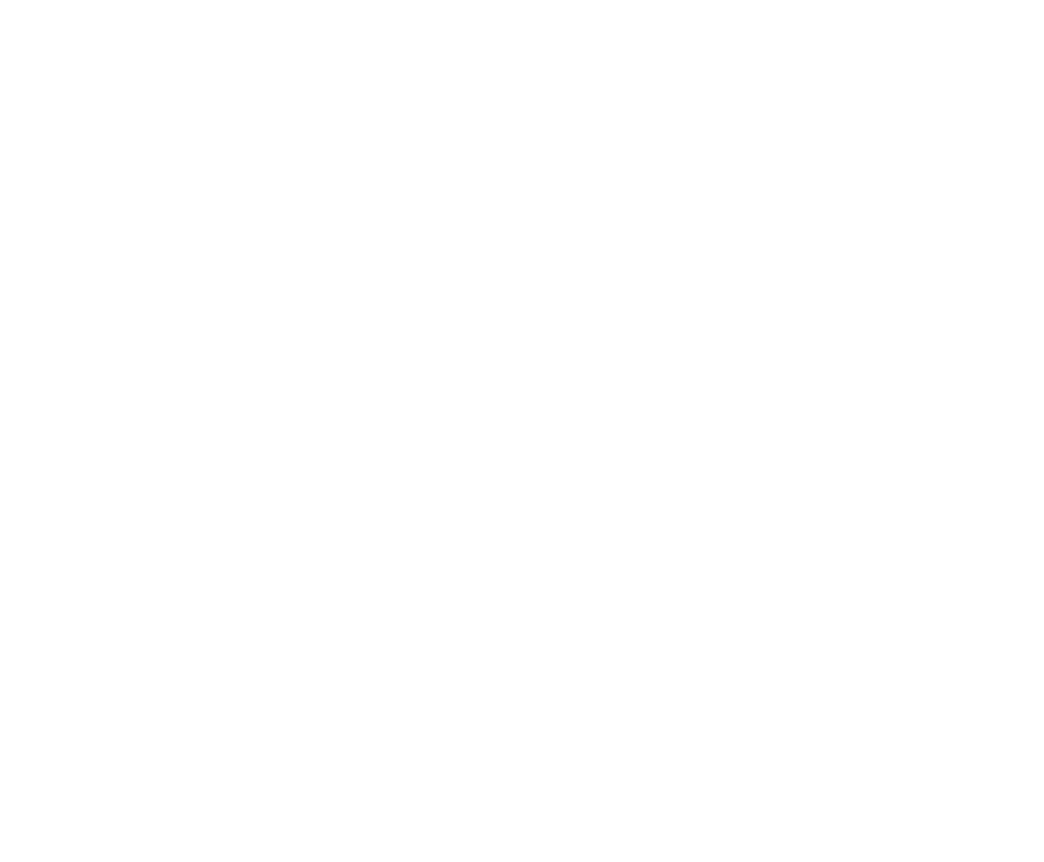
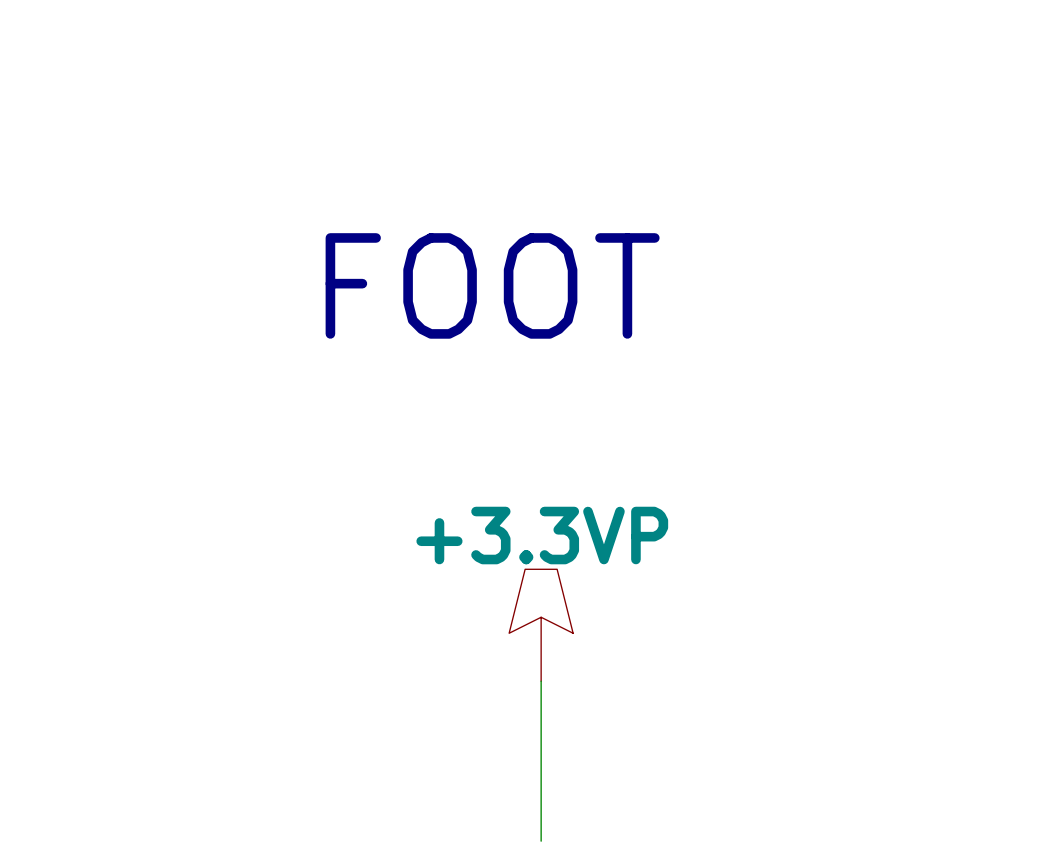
text: none -> FOOT (492, 285)
power symbol: none -> +3.3VP (541, 625)
wire: none -> (541, 681) (541, 841)

